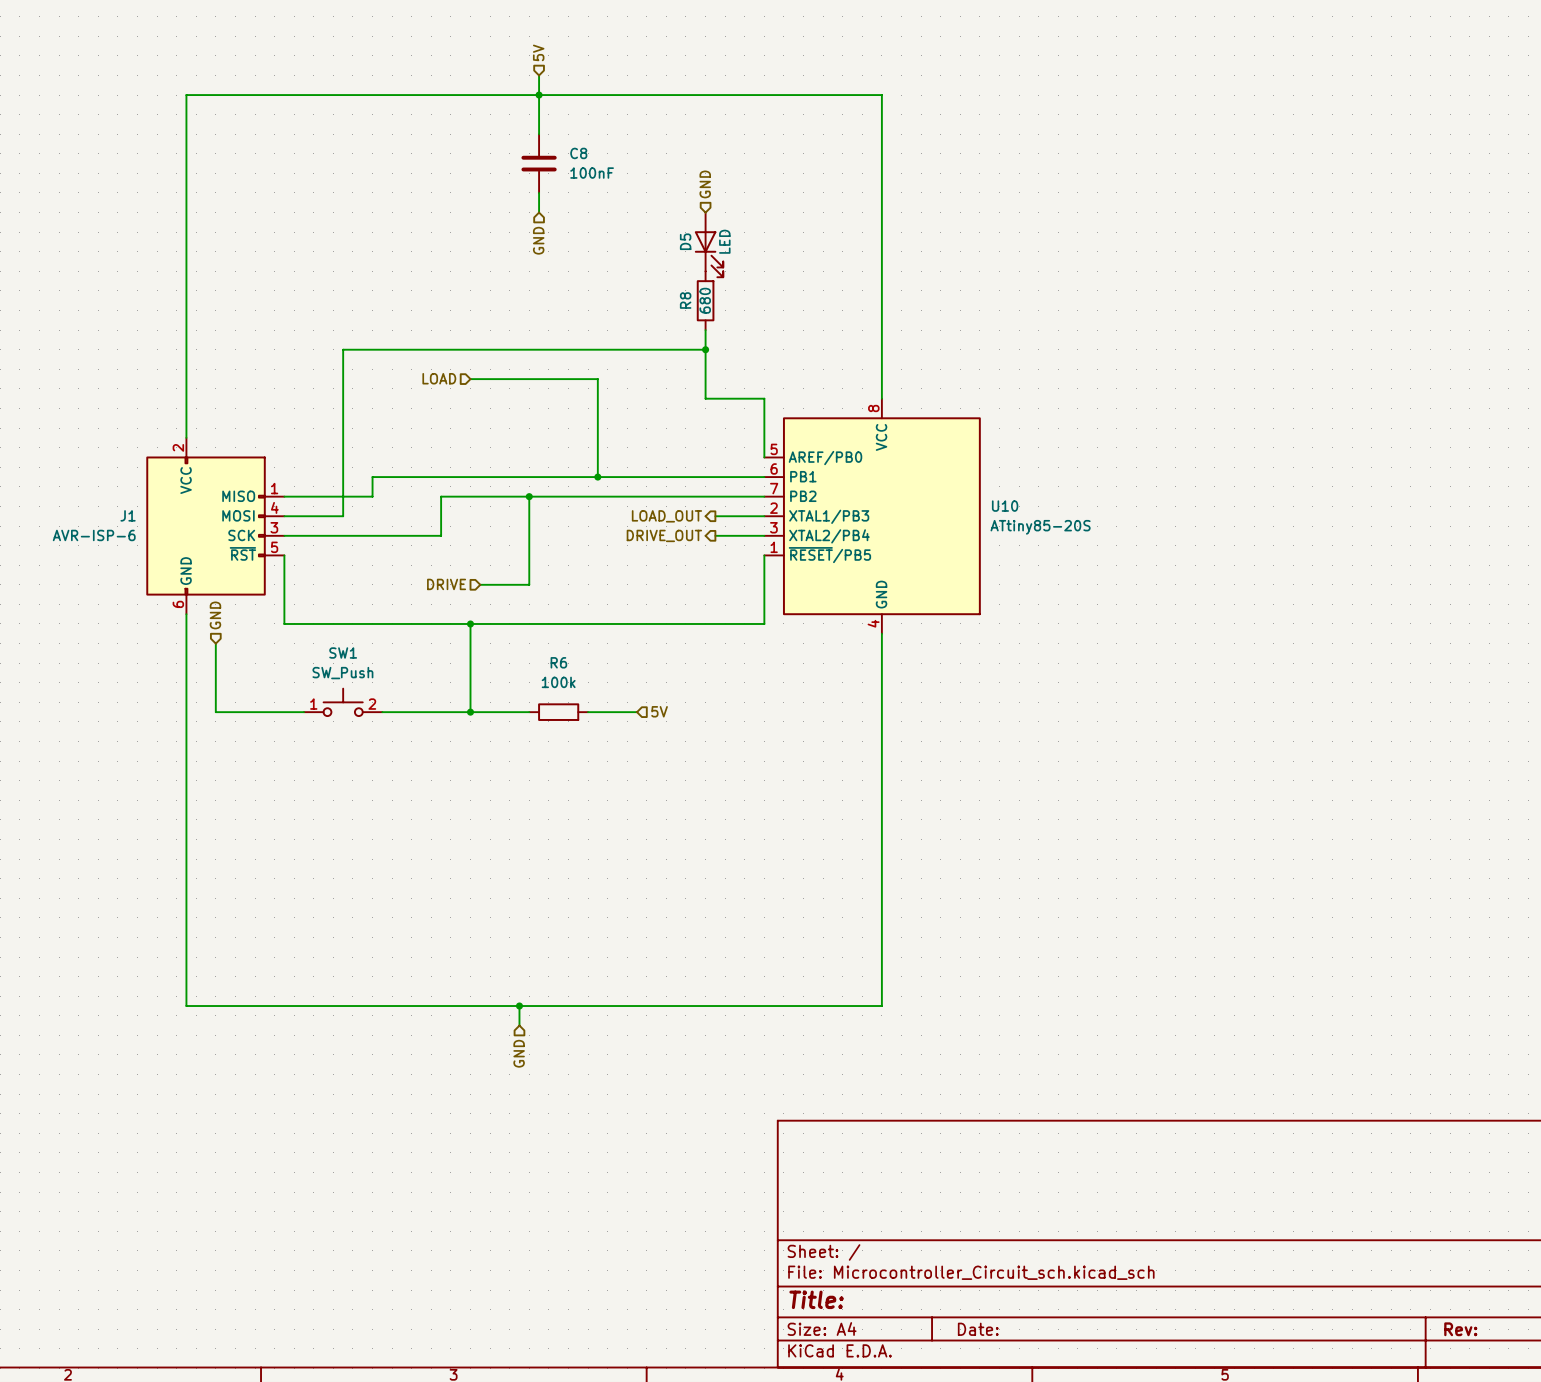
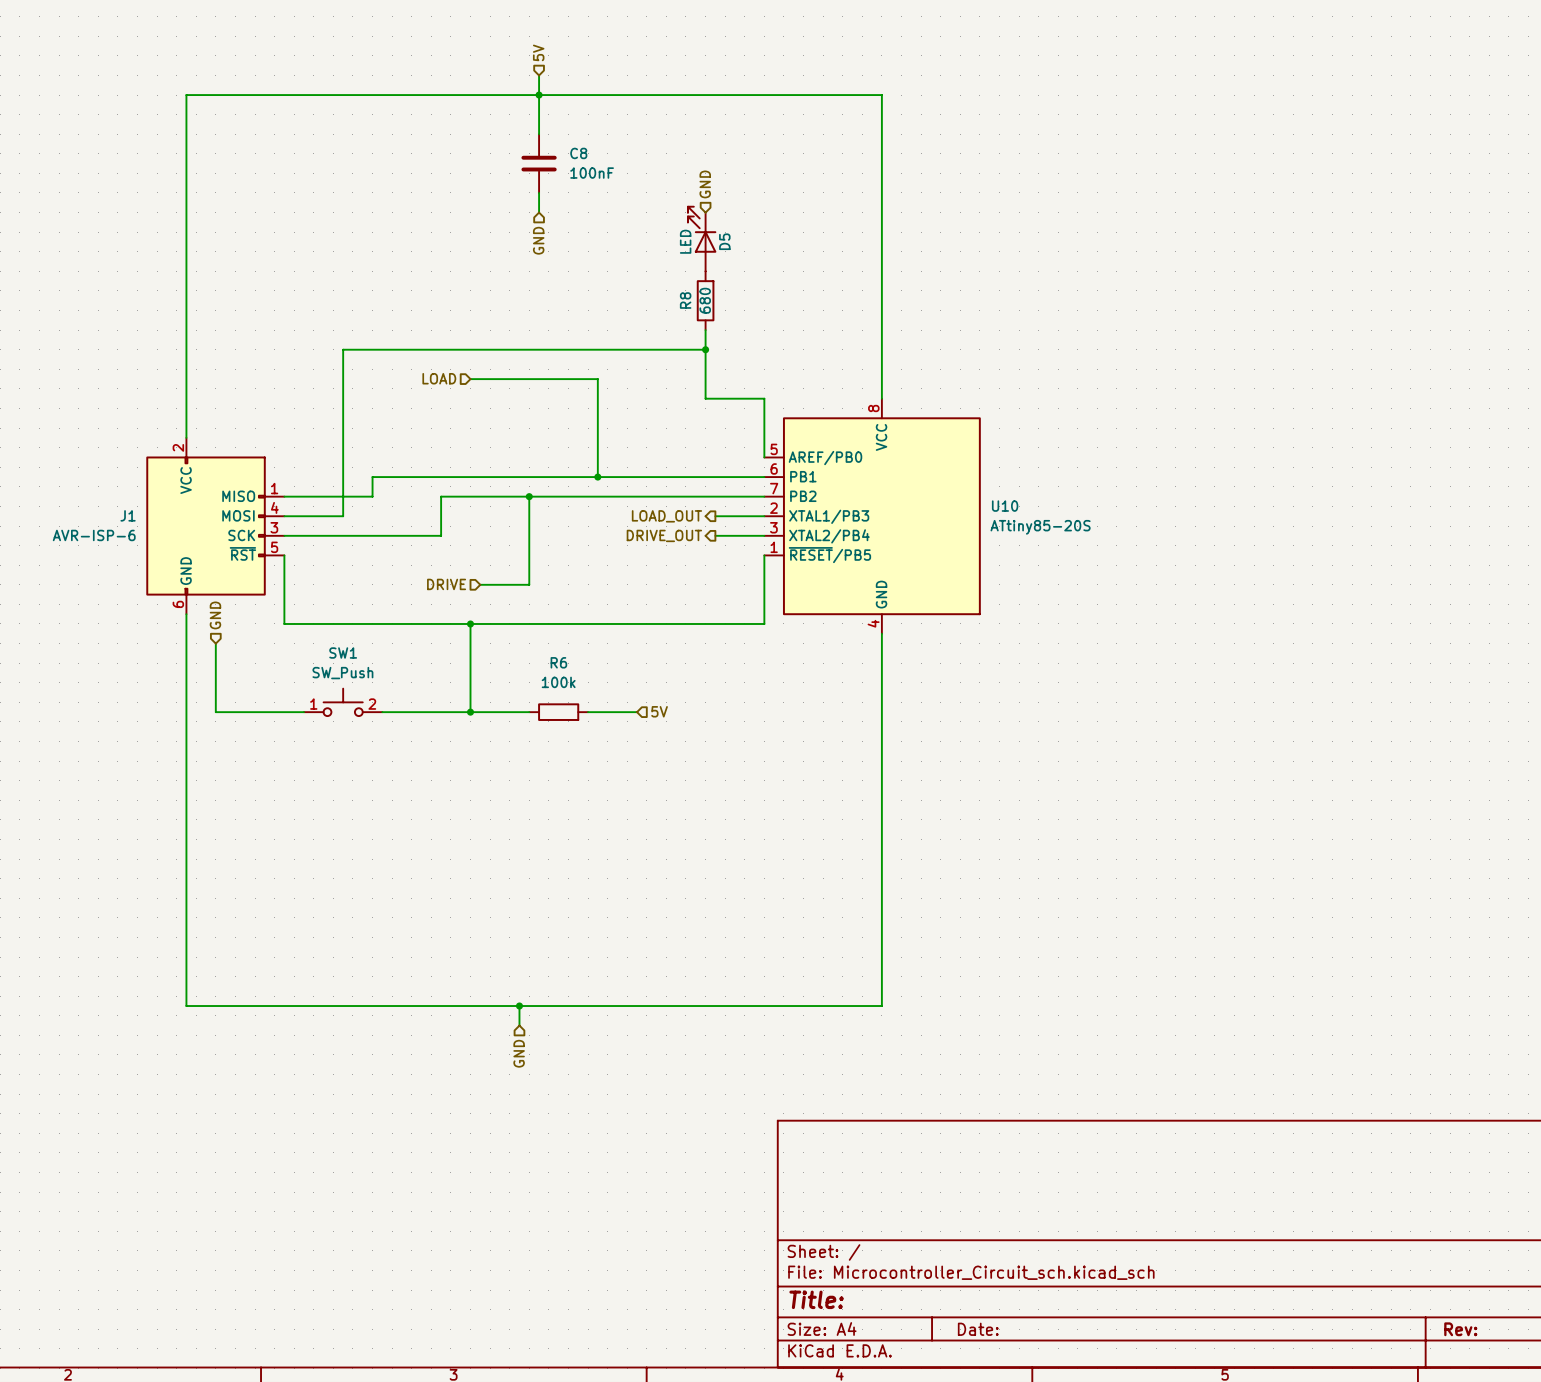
D5 rotation: 0° (709, 254) -> 180° (702, 229)

